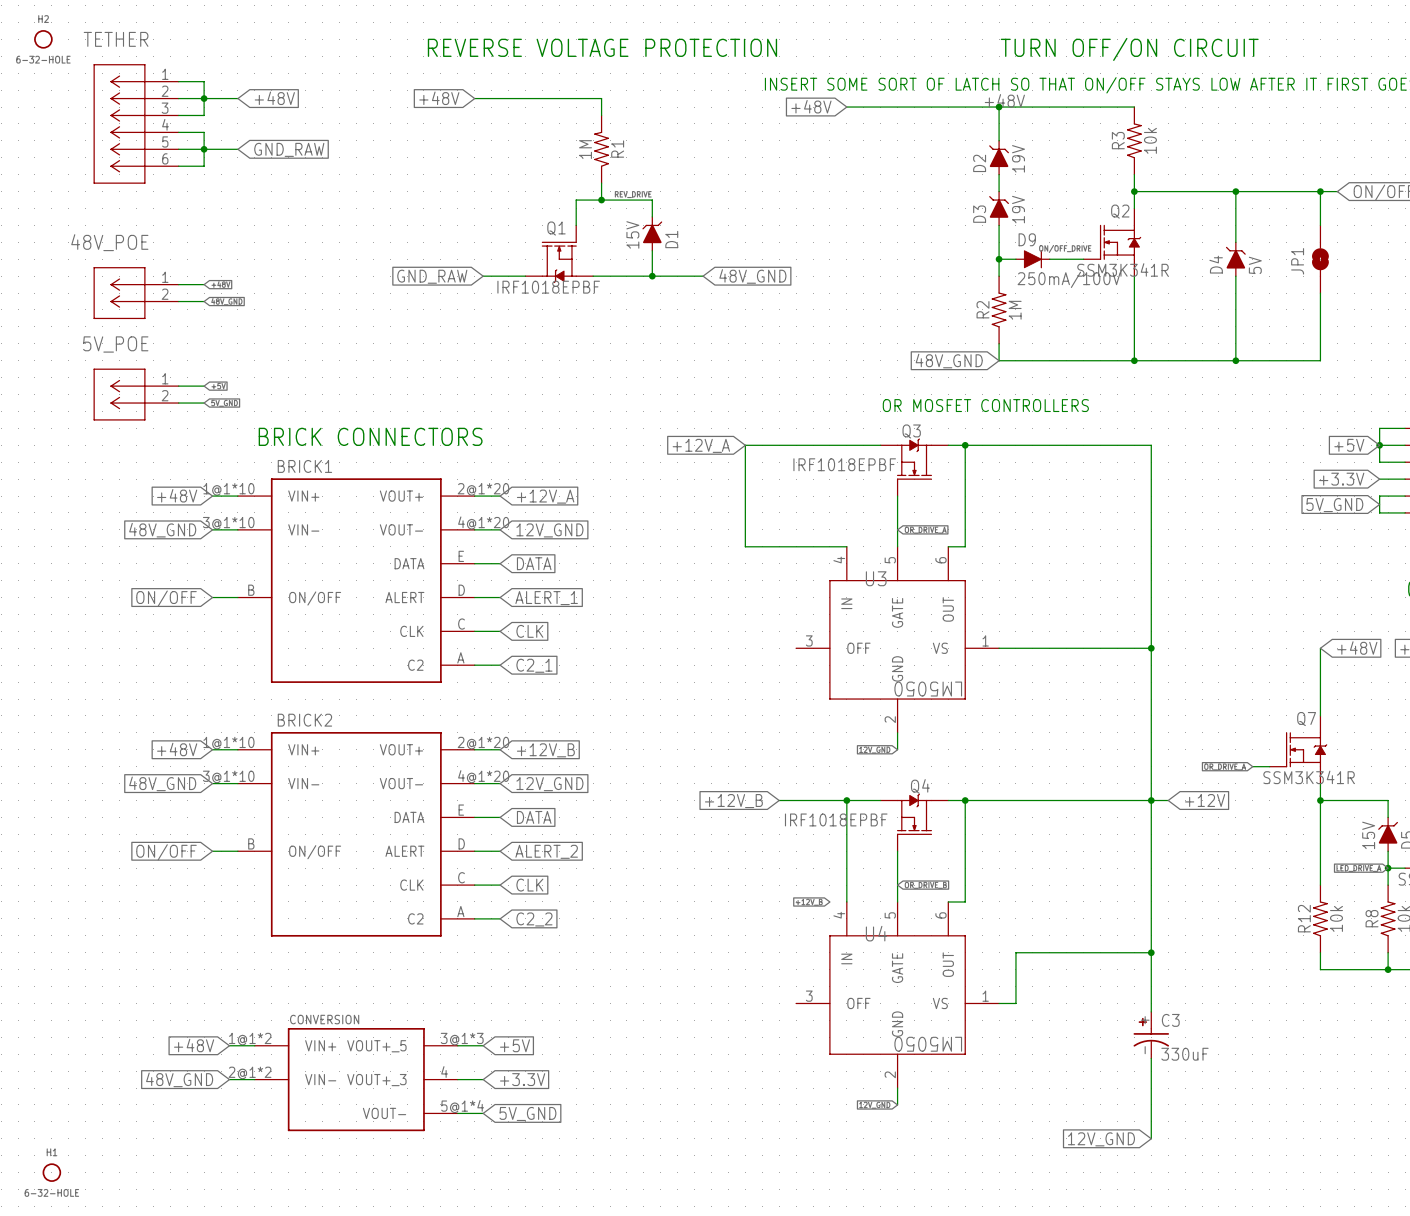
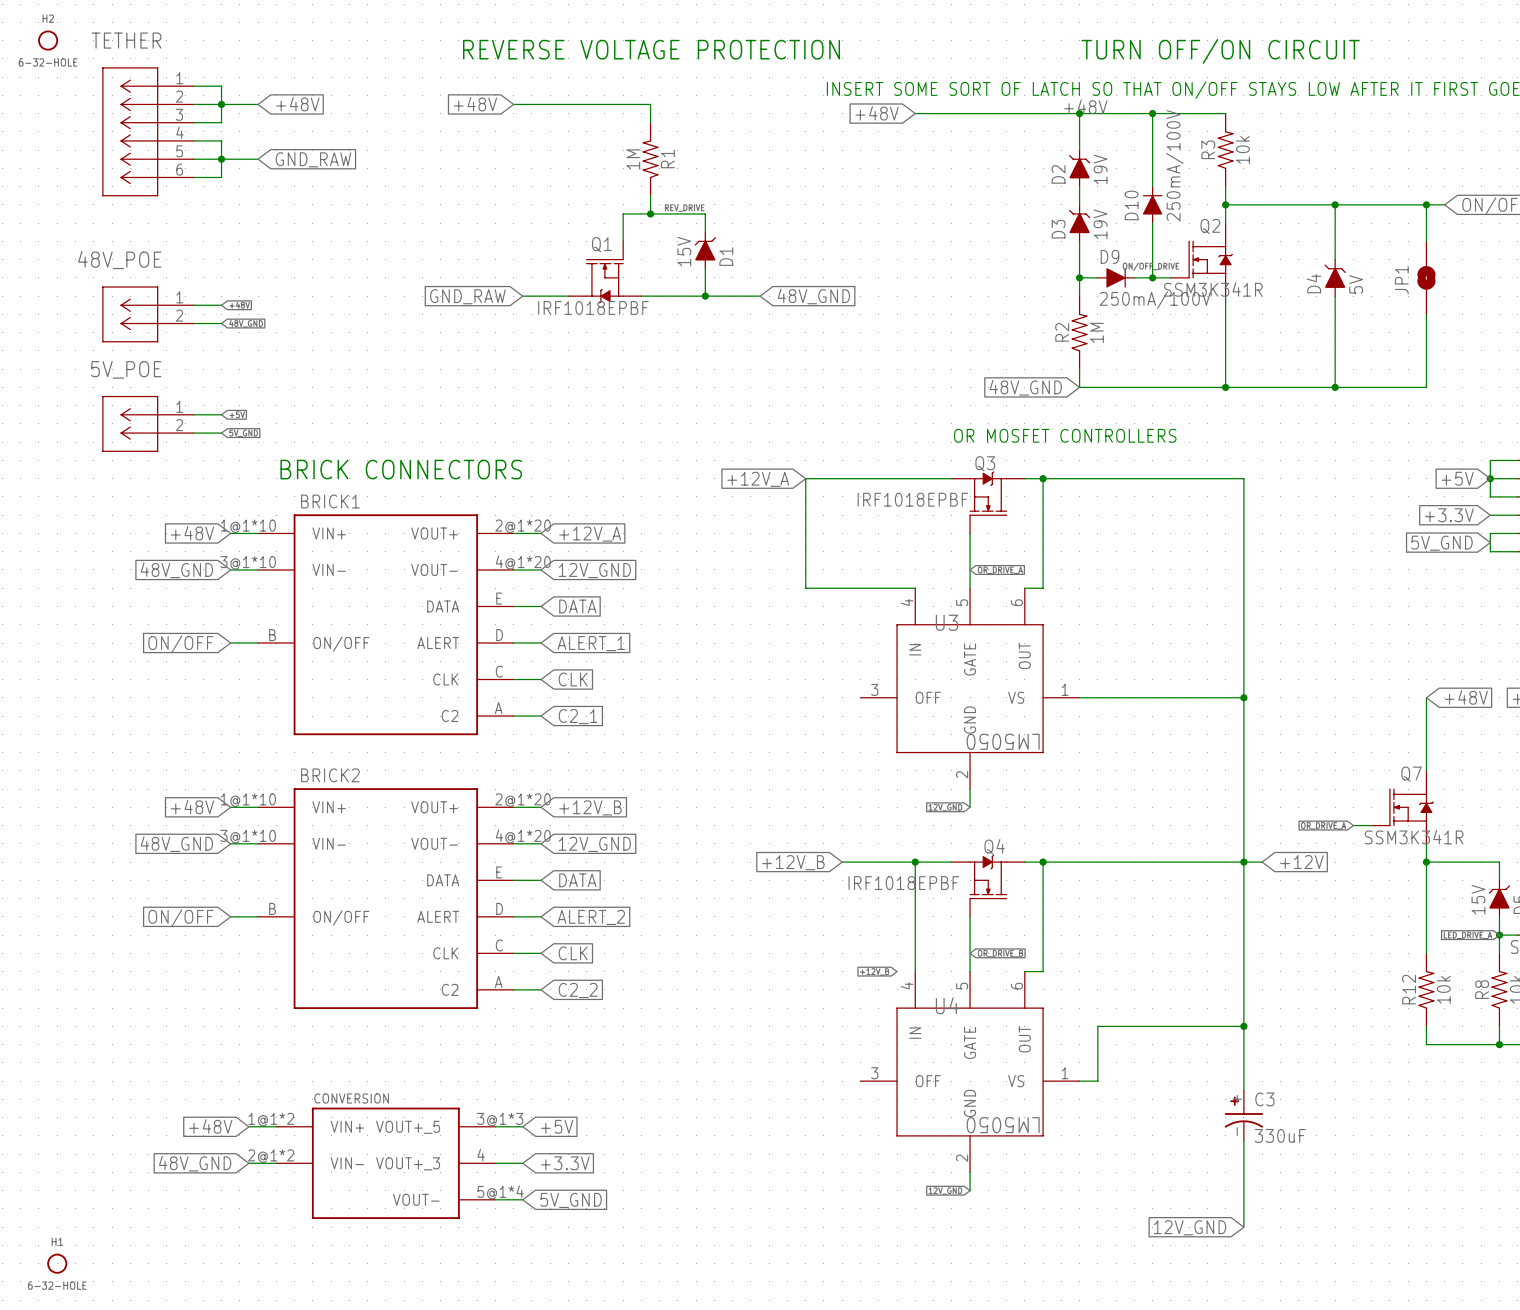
wire: none -> (1152, 113) (1152, 186)
junction: none -> (1152, 113)
D10: none -> 250mA/100V (1152, 204)
wire: none -> (1152, 223) (1152, 277)
junction: none -> (1152, 277)

